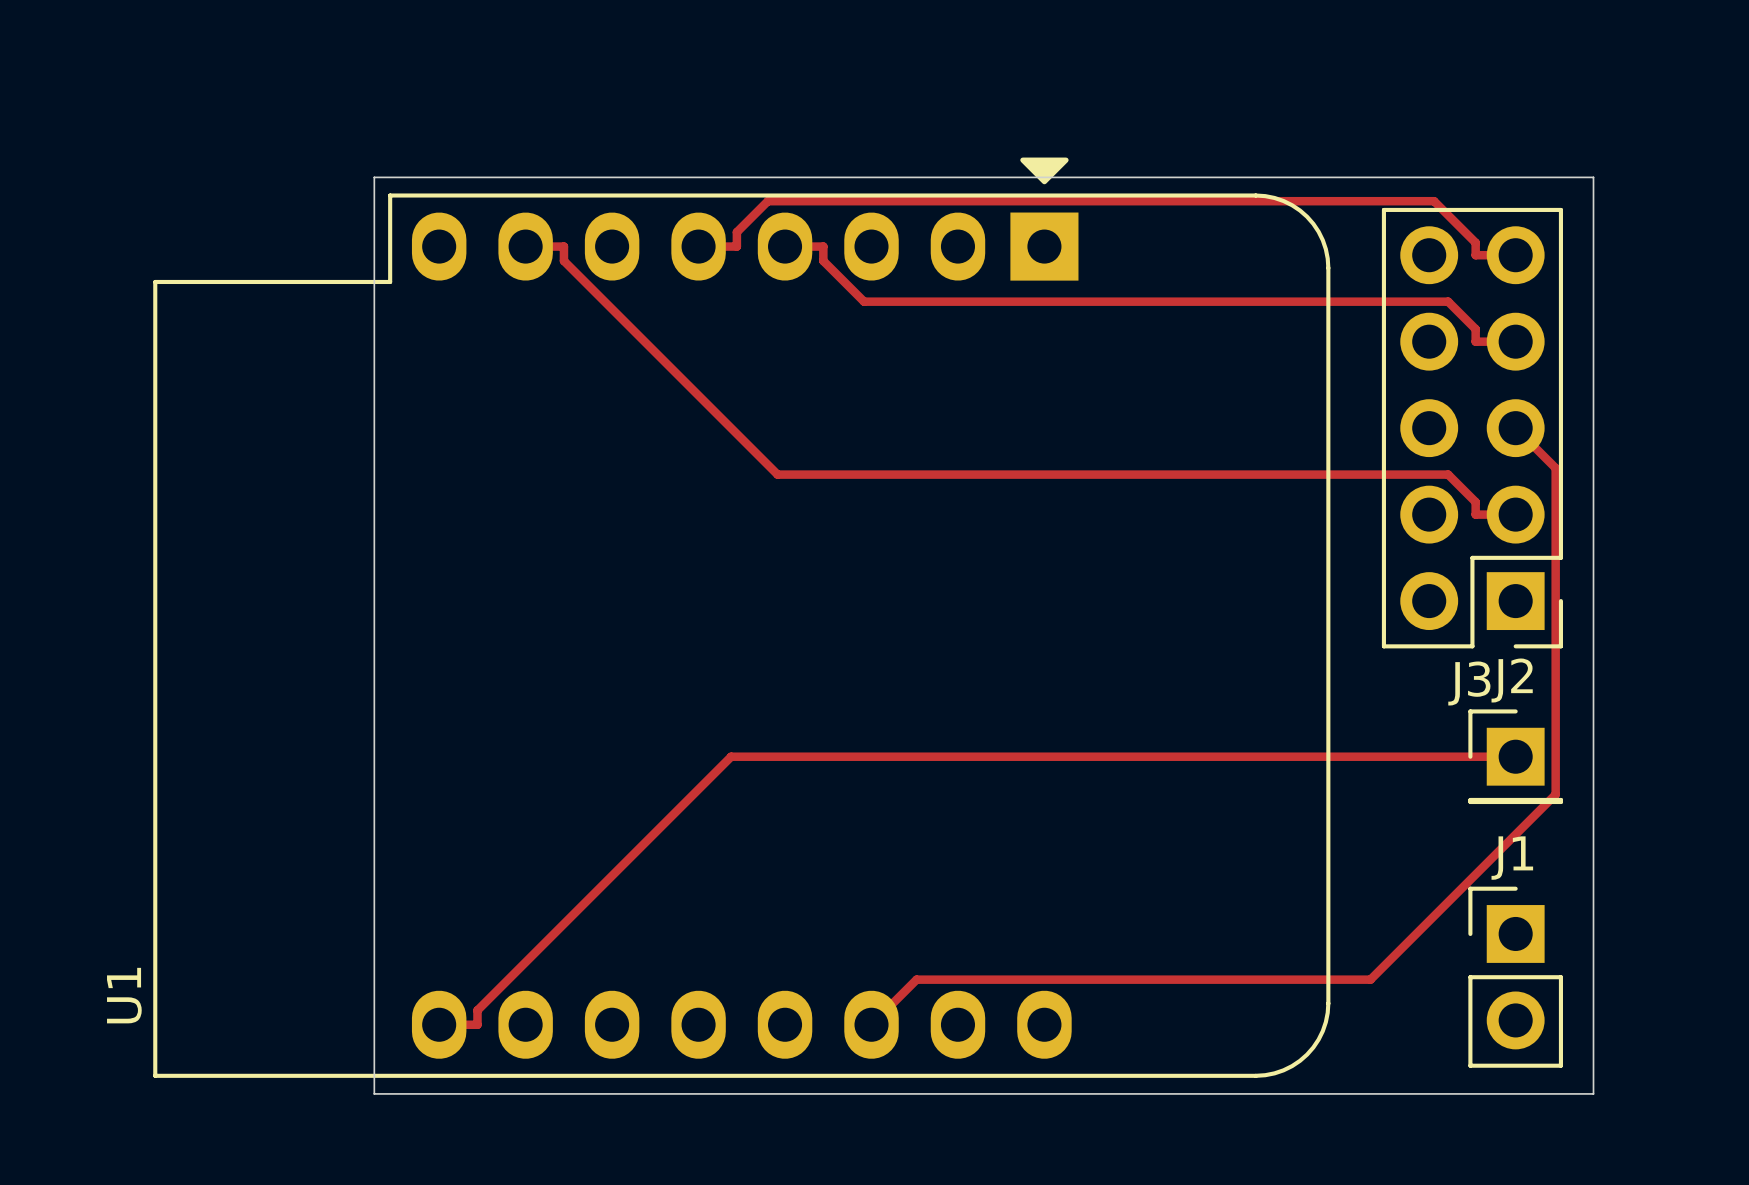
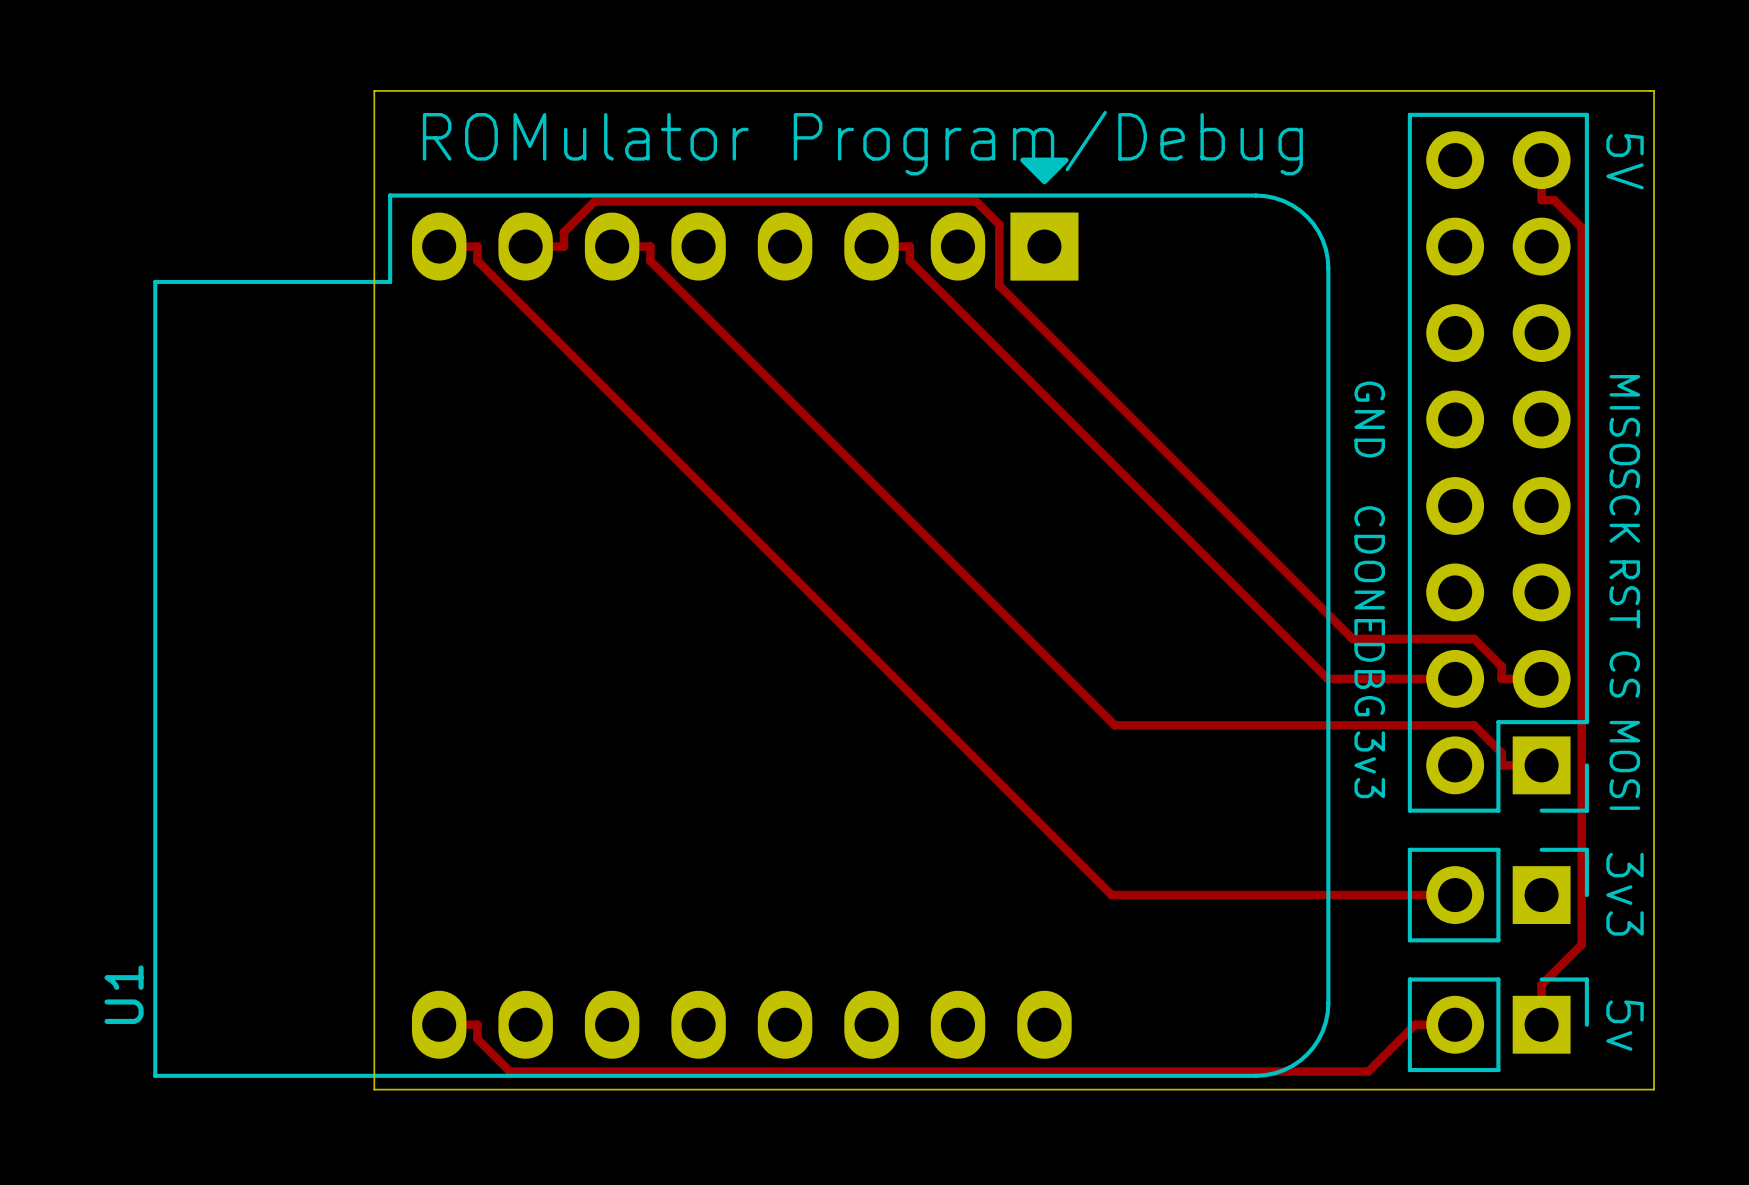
text: none -> ROMulator Program/Debug (862, 143)
track: none -> (1541, 160) (1541, 200) (1554, 200) (1581, 227) (1581, 944) (1541, 984) (1541, 1024)
text: none -> 5V (1625, 161)
board edge: (374, 177) (1593, 177) (1593, 1093) (374, 1093) (374, 1089) -> (374, 177) (374, 90) (1654, 90) (1654, 1089) (374, 1089)
track: none -> (439, 246) (477, 246) (477, 260) (1111, 895) (1455, 895)
track: (563, 246) (563, 260) (777, 474) (1448, 474) (1475, 502) (1475, 514) (1515, 514) -> (563, 246) (563, 232) (594, 201) (976, 201) (999, 224) (999, 285) (1352, 638) (1474, 638) (1501, 666) (1501, 678) (1541, 678)
track: none -> (612, 246) (650, 246) (650, 260) (1114, 725) (1474, 725) (1501, 752) (1501, 765) (1541, 765)
track: (698, 246) (736, 246) (736, 232) (767, 201) (1434, 201) (1475, 242) (1475, 255) (1515, 255) -> none
track: (785, 246) (823, 246) (823, 260) (864, 301) (1448, 301) (1475, 329) (1475, 341) (1515, 341) -> none
track: none -> (871, 246) (909, 246) (909, 260) (1327, 678) (1455, 678)
text: none -> GND (1369, 419)
text: none -> MISO (1624, 420)
J3: (1472, 428) -> none
track: (1515, 428) (1555, 468) (1555, 794) (1370, 979) (916, 979) (871, 1024) -> none
part: none -> (1498, 462)
text: none -> SCK (1624, 505)
text: none -> CDONE (1369, 570)
text: none -> RST (1624, 594)
text: none -> CS (1624, 674)
text: none -> DBG (1369, 679)
track: (1515, 756) (731, 756) (477, 1010) (477, 1024) -> (1455, 1024) (1415, 1024) (1368, 1071) (509, 1071) (477, 1039) (477, 1024)
J2: (1515, 756) -> none
text: none -> 3v3 (1369, 764)
text: none -> MOSI (1624, 765)
text: none -> 3v3 (1625, 894)
part: none -> (1498, 895)
J1: (1515, 977) -> none
part: none -> (1498, 1024)
text: none -> 5v (1625, 1025)

